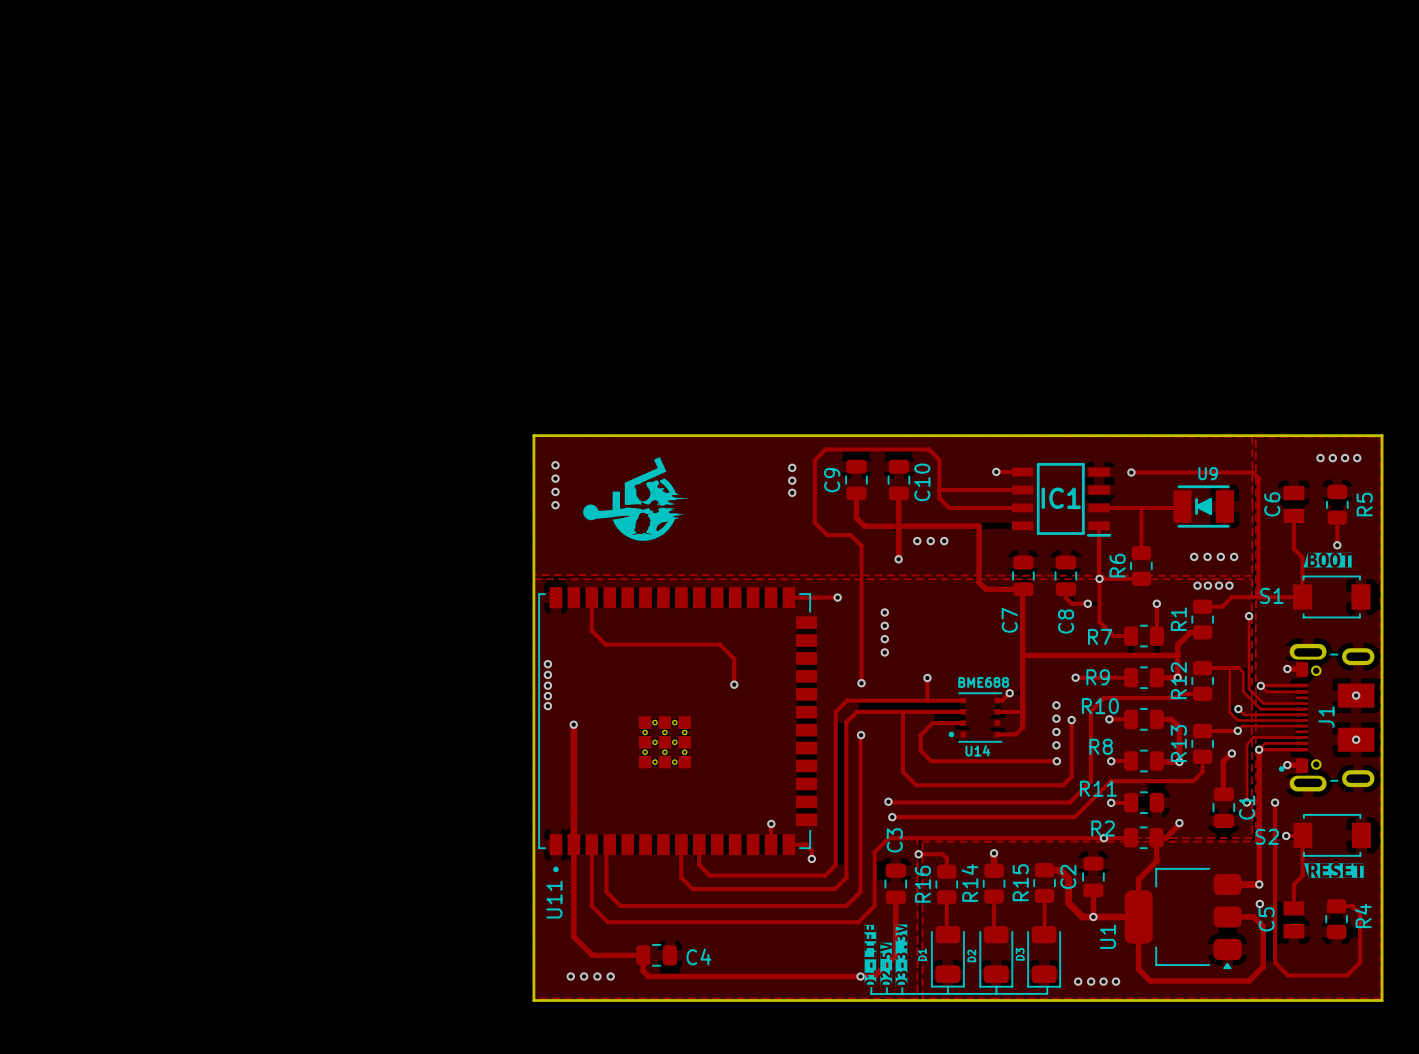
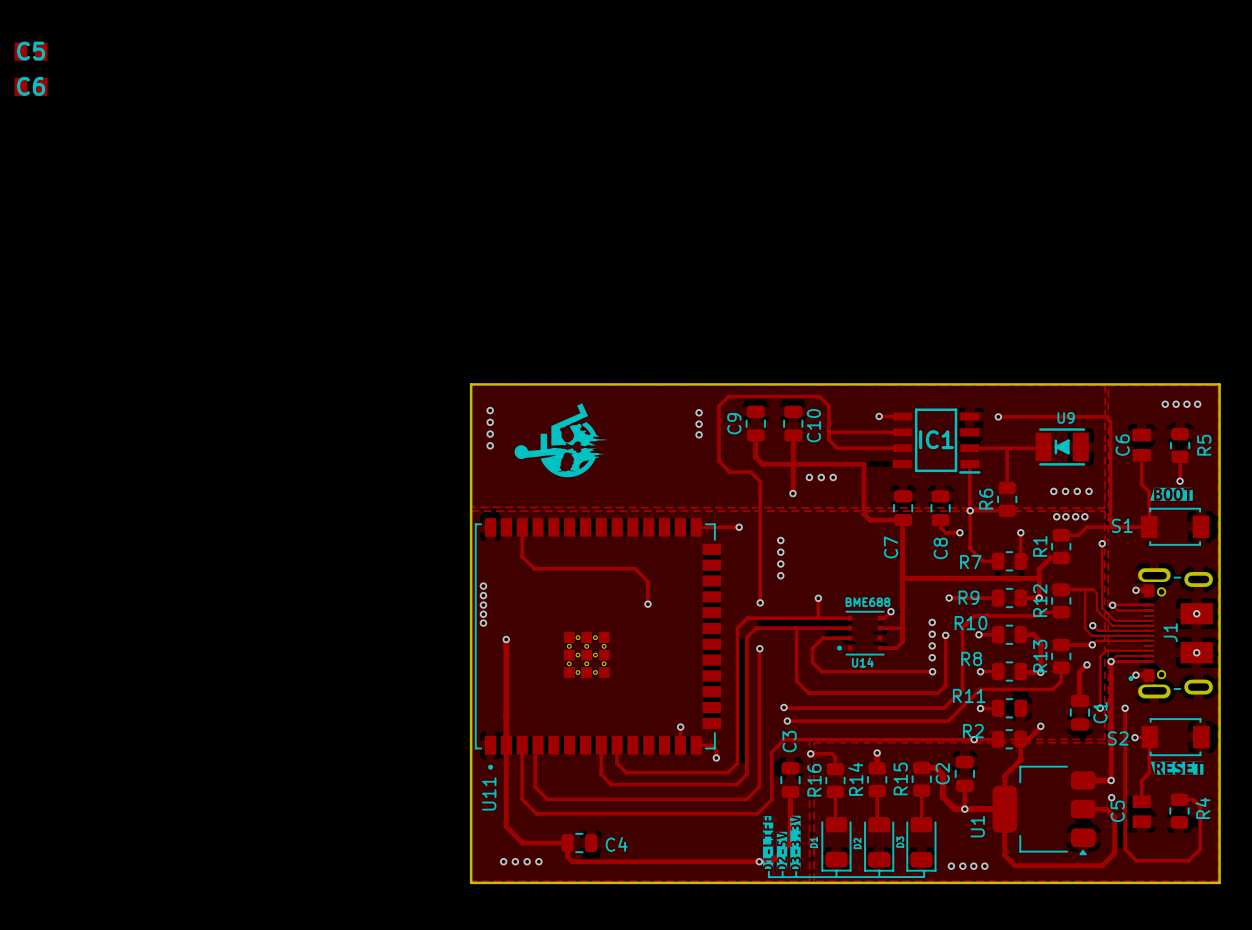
C5: none -> (31, 51)
C6: none -> (31, 86)

